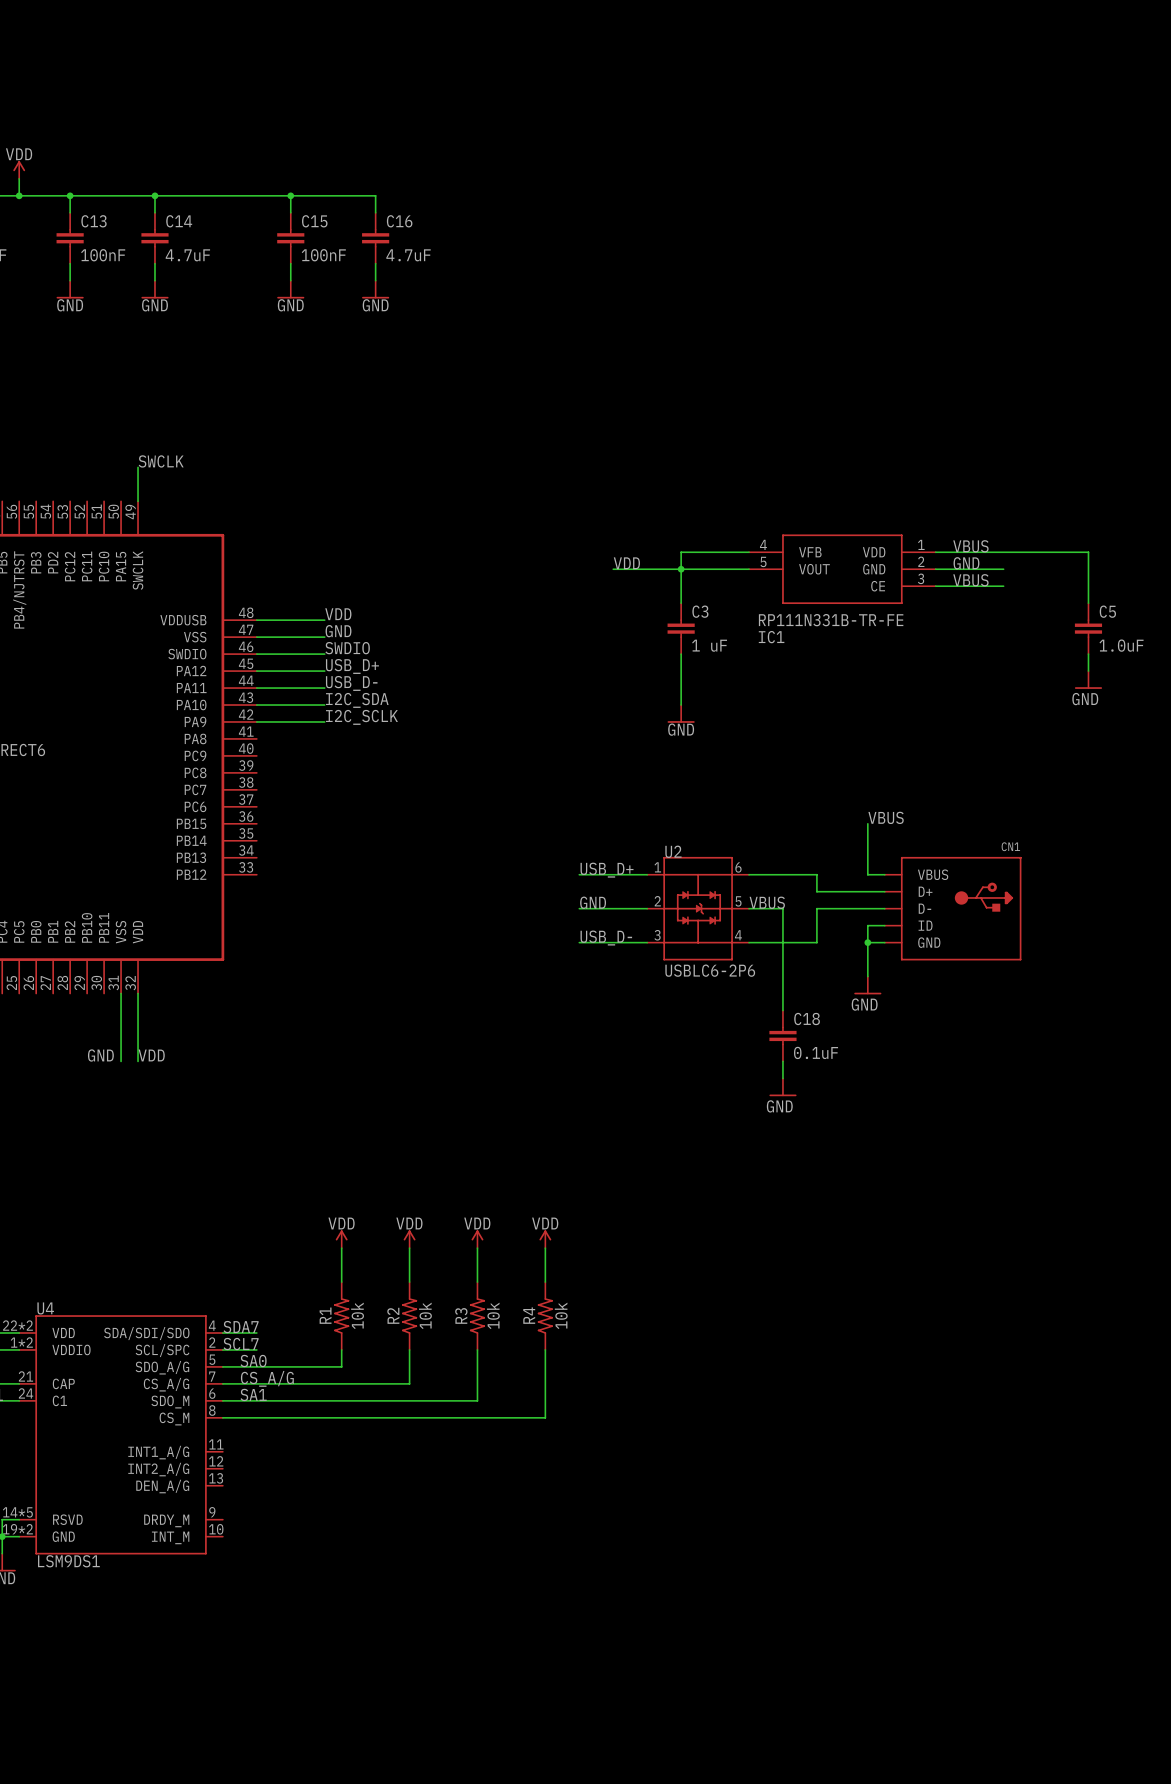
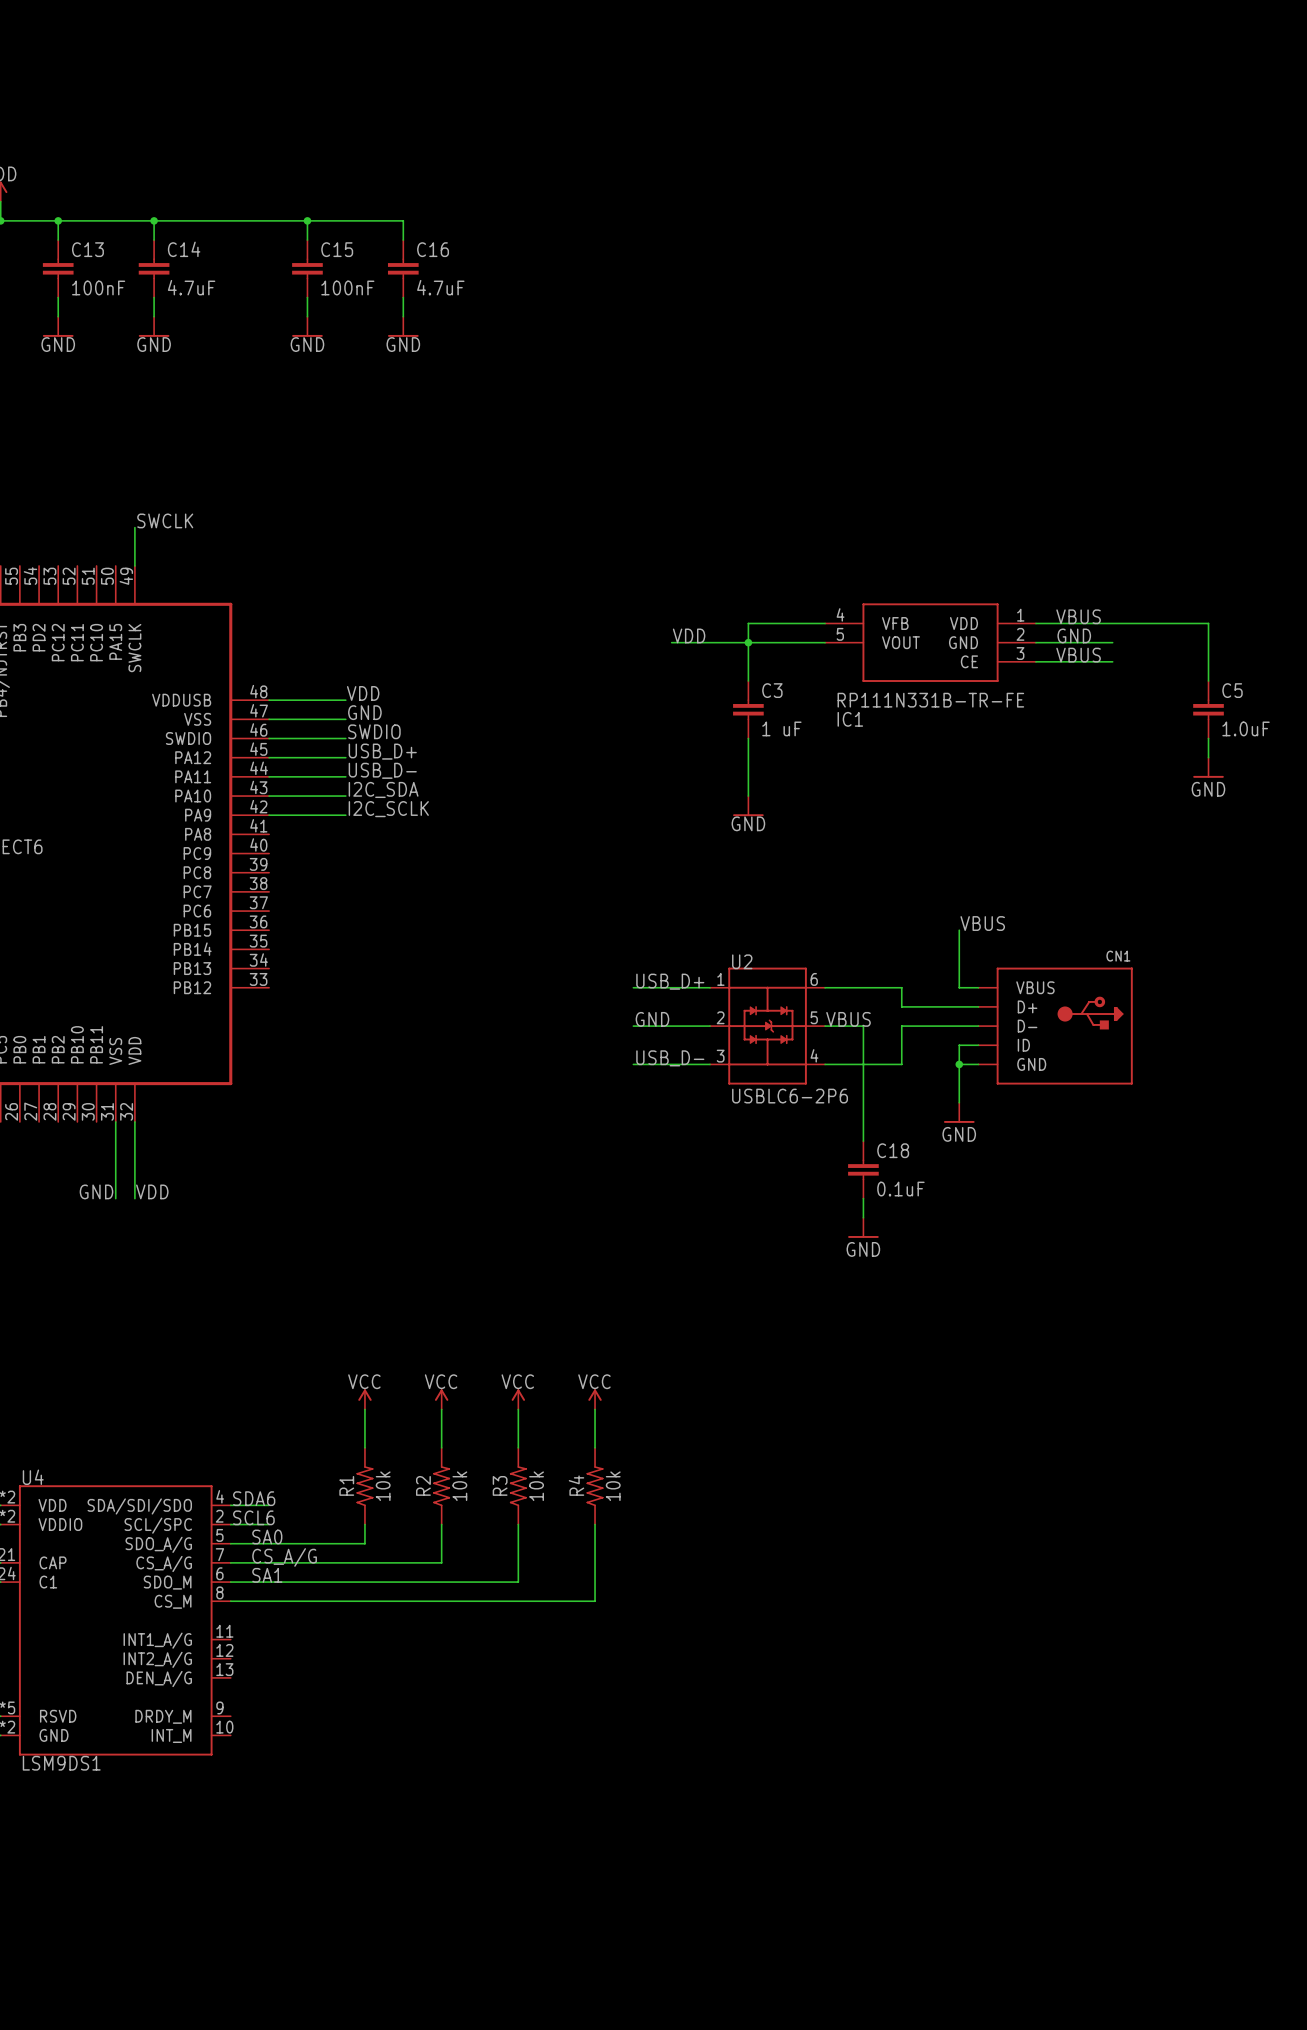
power symbol: VDD (341, 1239) -> VCC (364, 1399)
power symbol: VDD (409, 1239) -> VCC (441, 1399)
power symbol: VDD (477, 1239) -> VCC (518, 1399)
power symbol: VDD (545, 1239) -> VCC (595, 1399)
label: SDA7 (241, 1327) -> SDA6 (254, 1498)
label: SCL7 (241, 1344) -> SCL6 (253, 1517)

